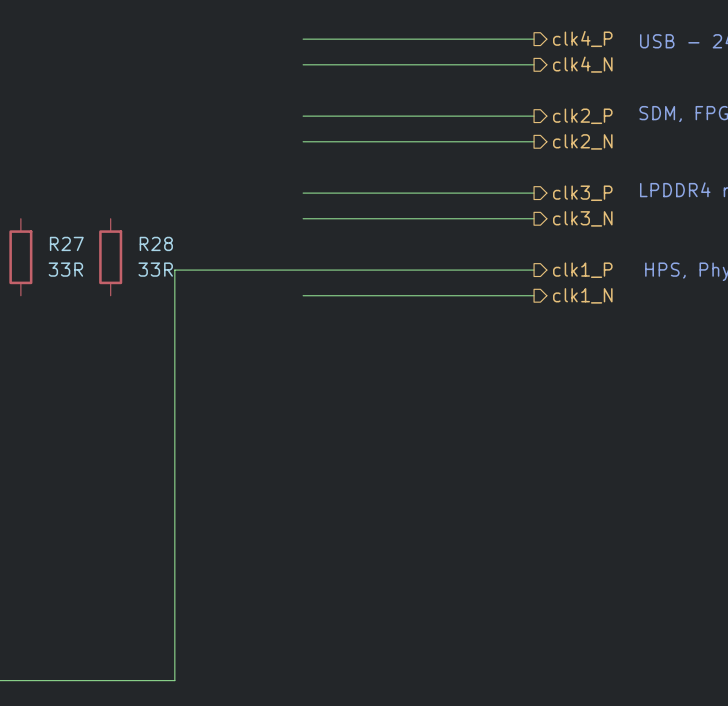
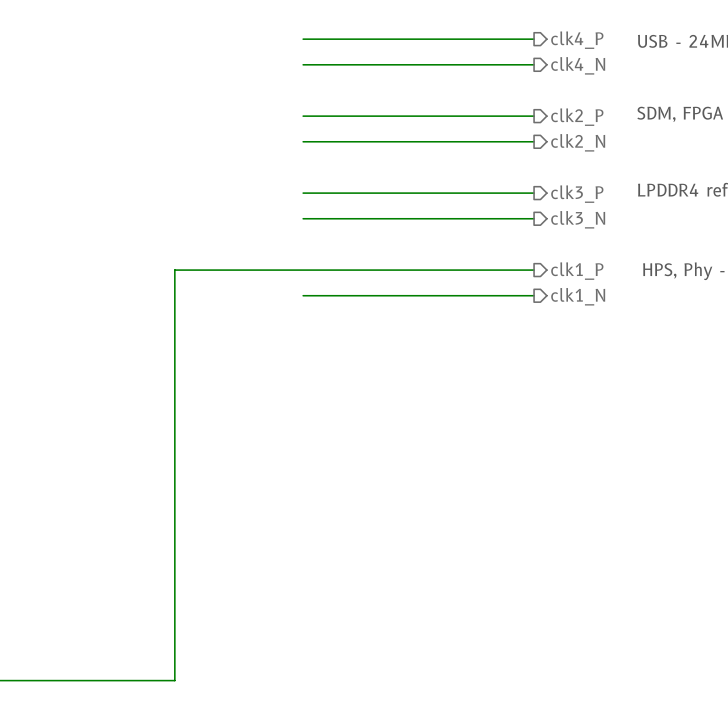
R27: 33R (20, 257) -> none
R28: 33R (110, 257) -> none

